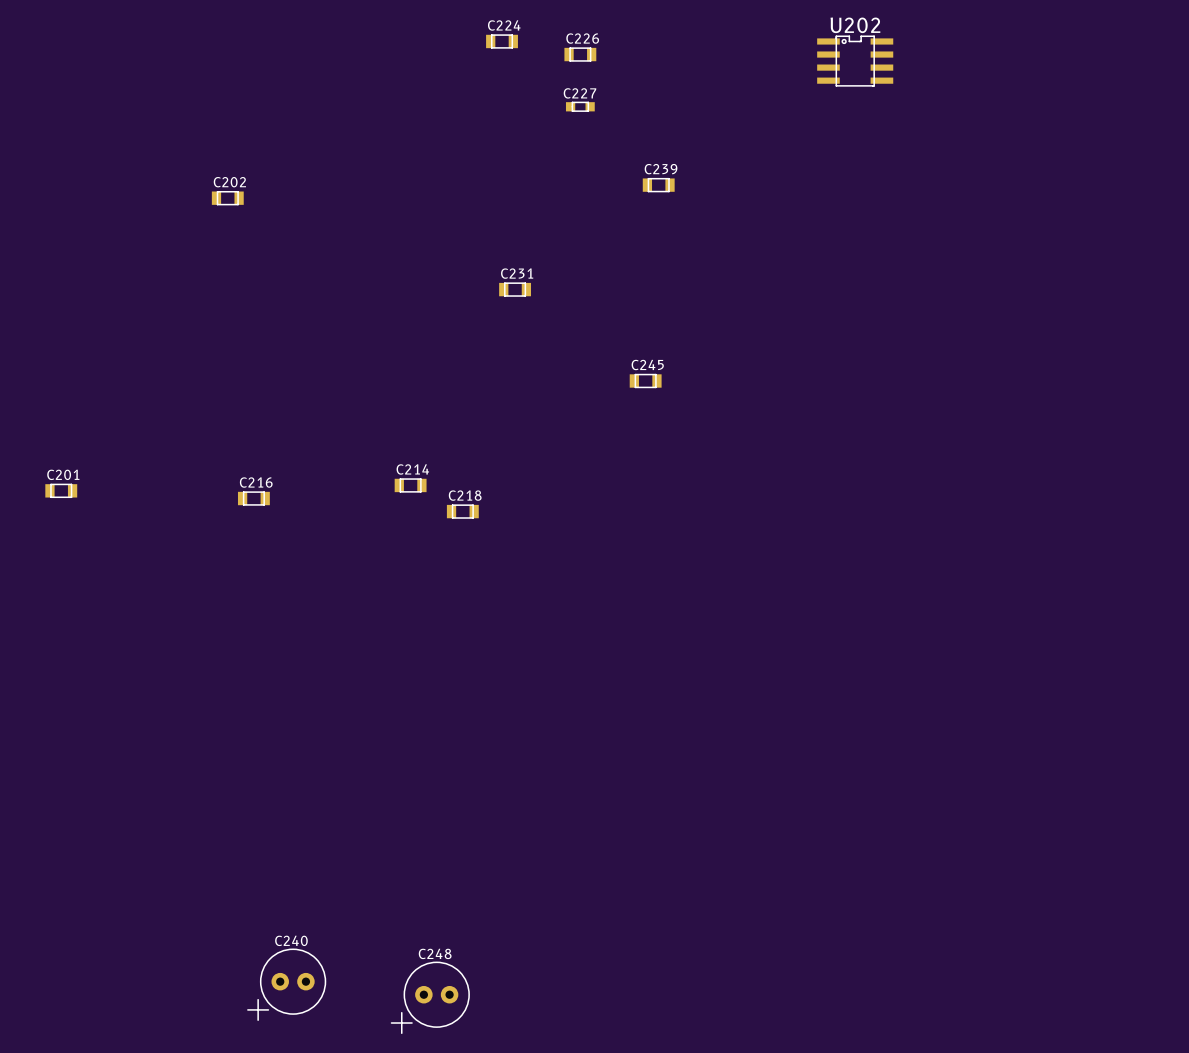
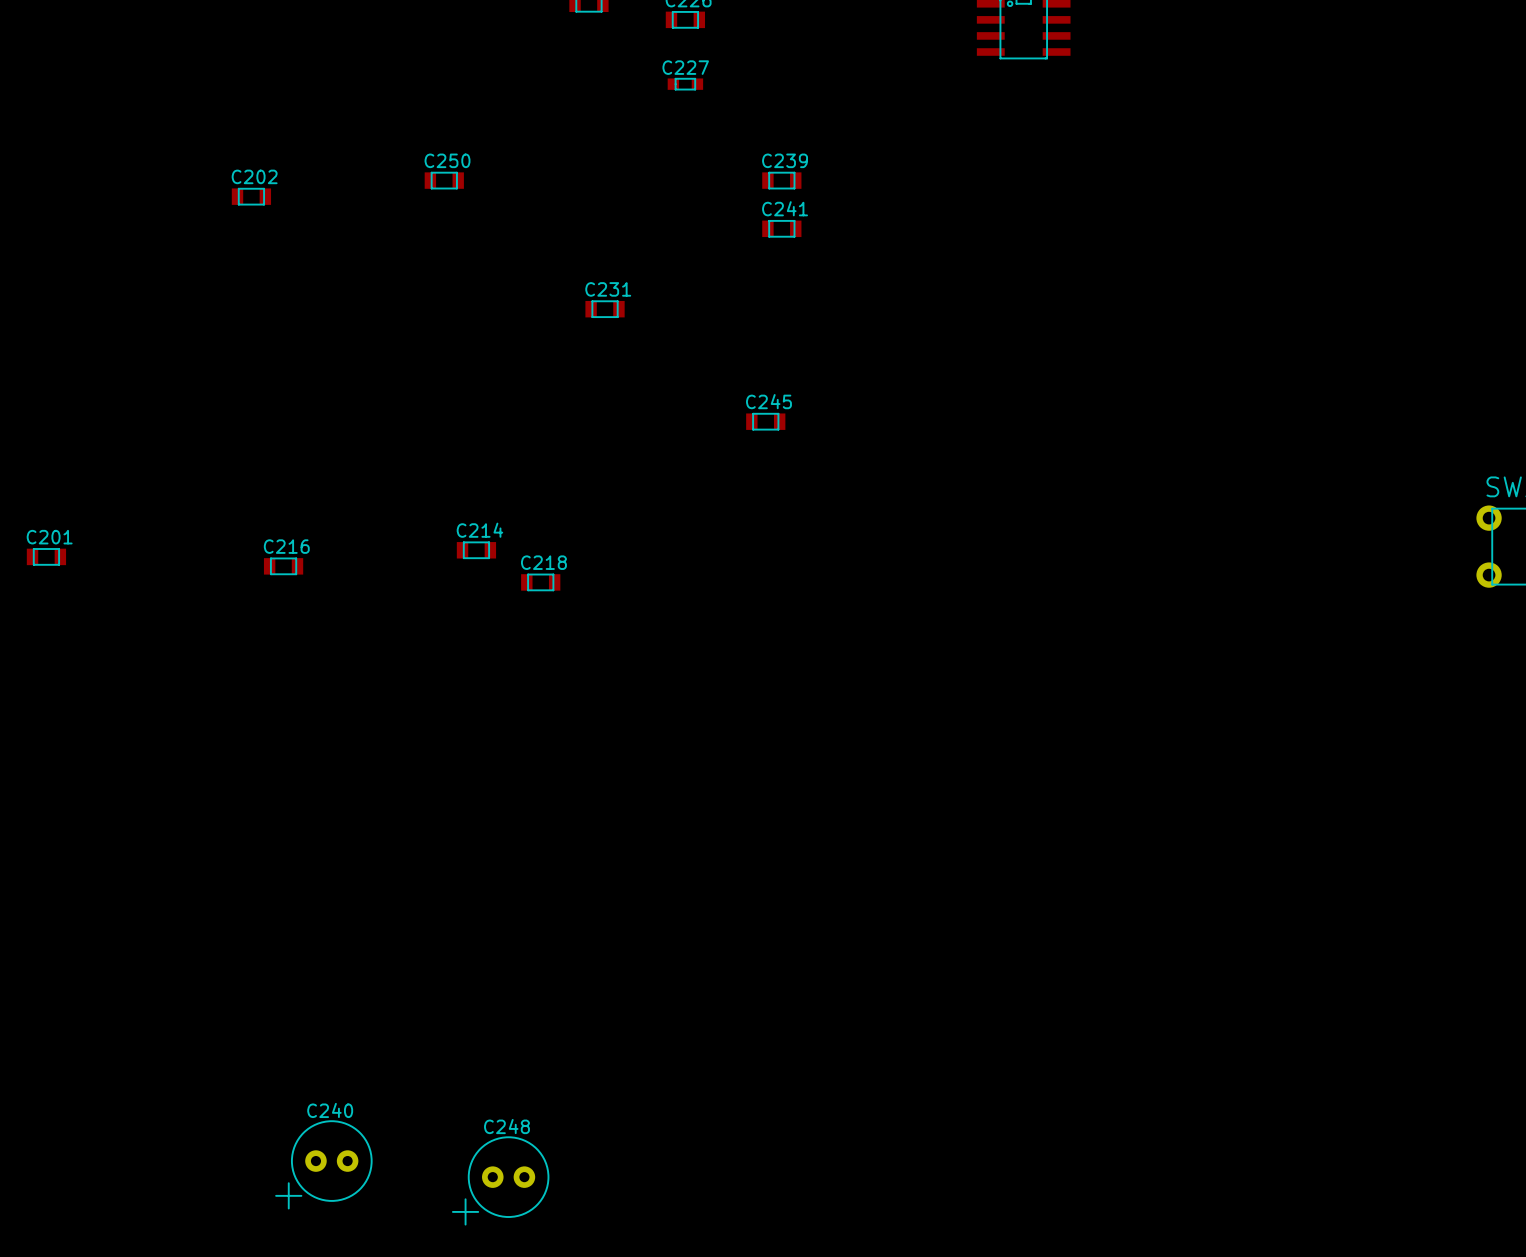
C250: none -> (444, 180)
C241: none -> (781, 228)

